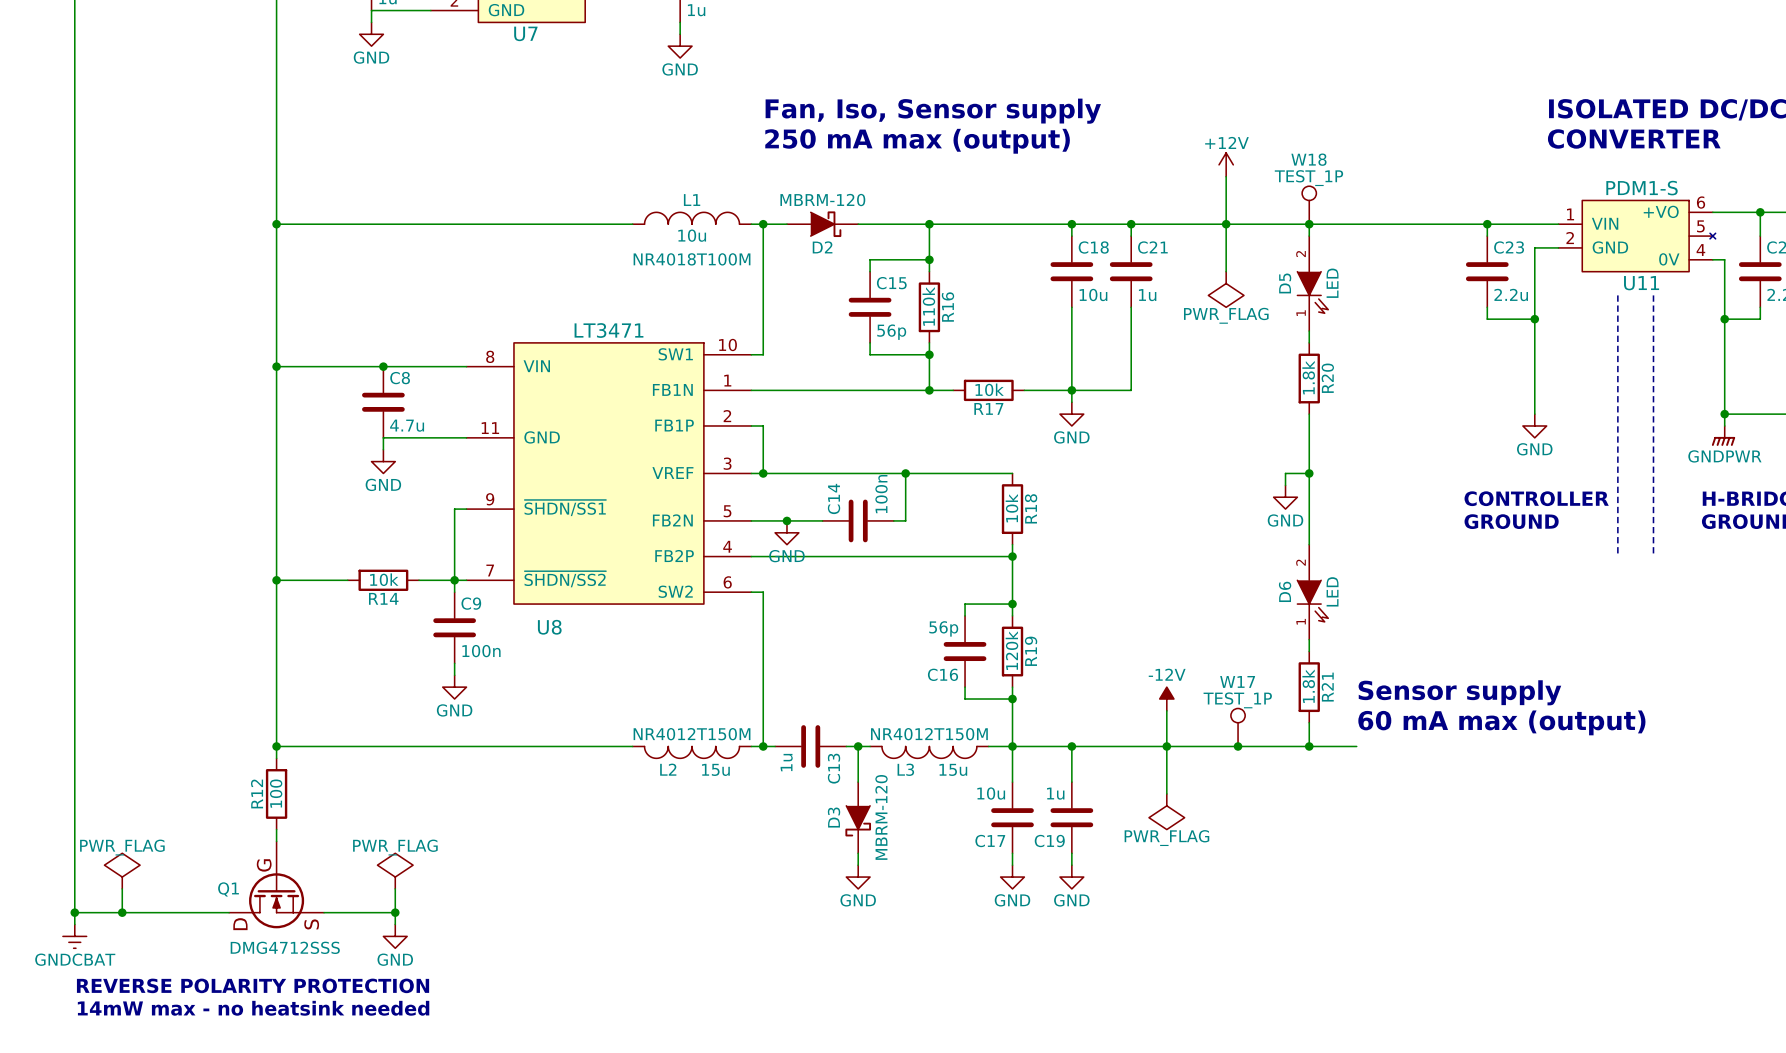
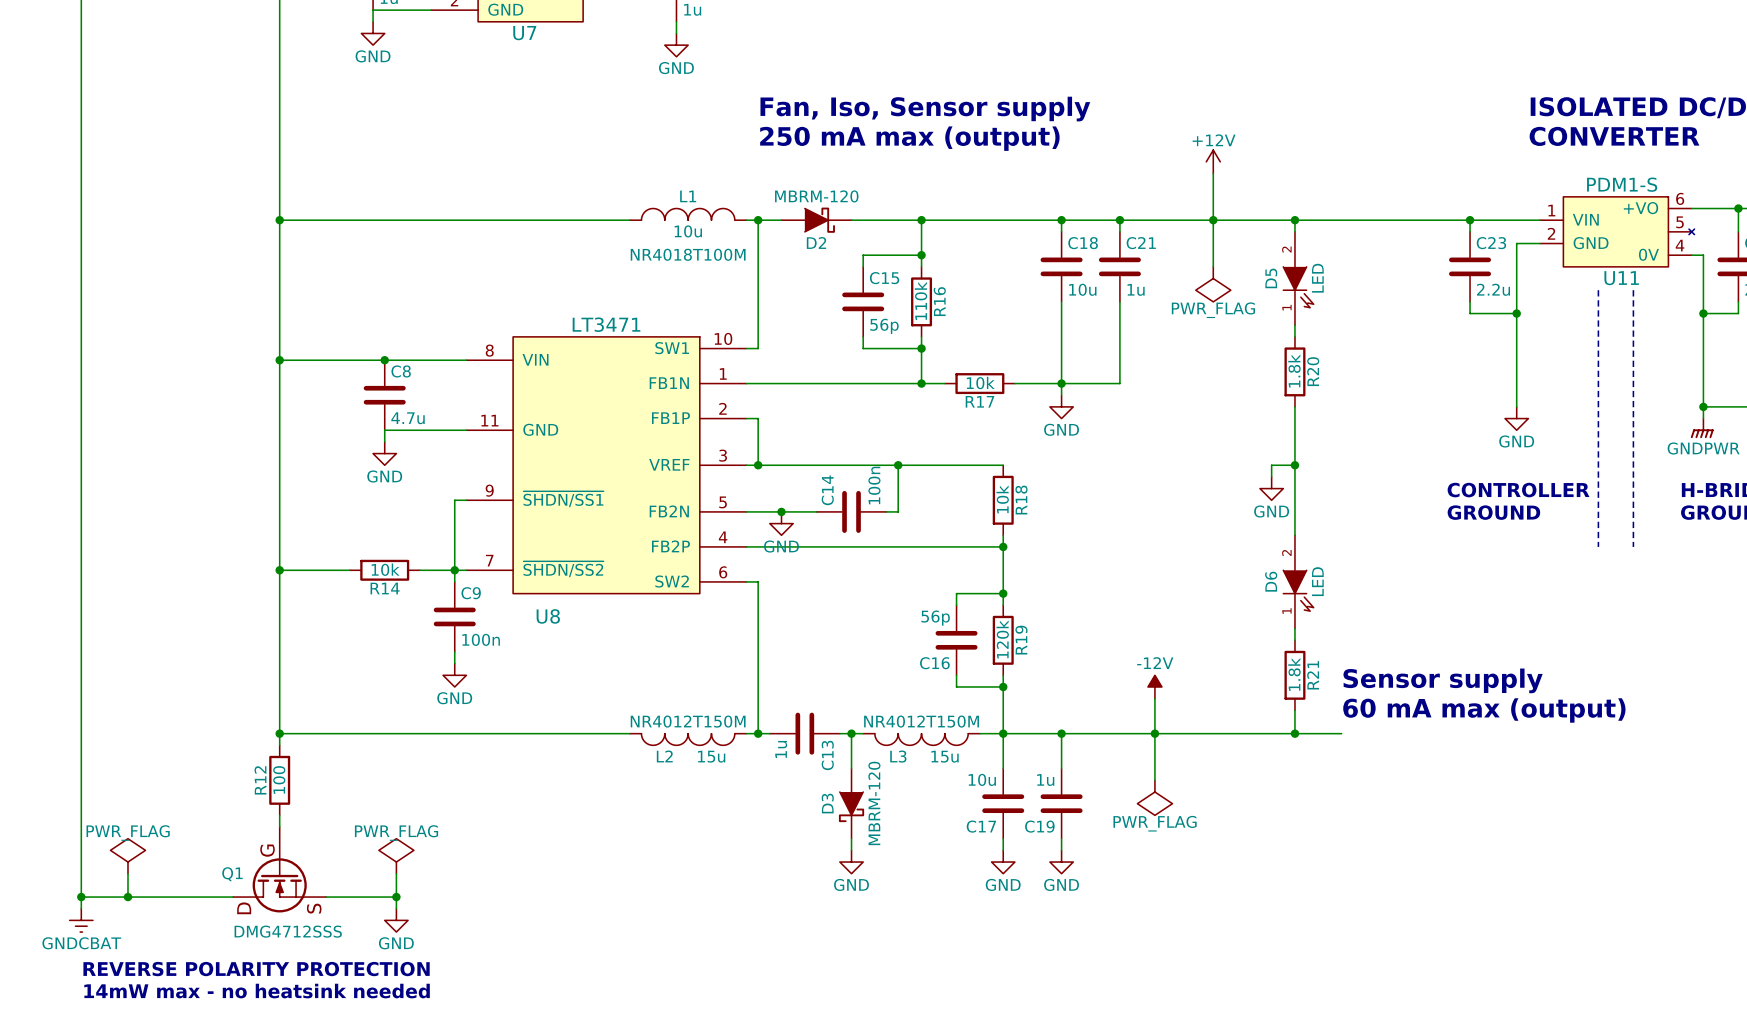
W18: TEST_1P (1309, 205) -> none
W17: TEST_1P (1238, 727) -> none
junction: (1238, 746) -> none

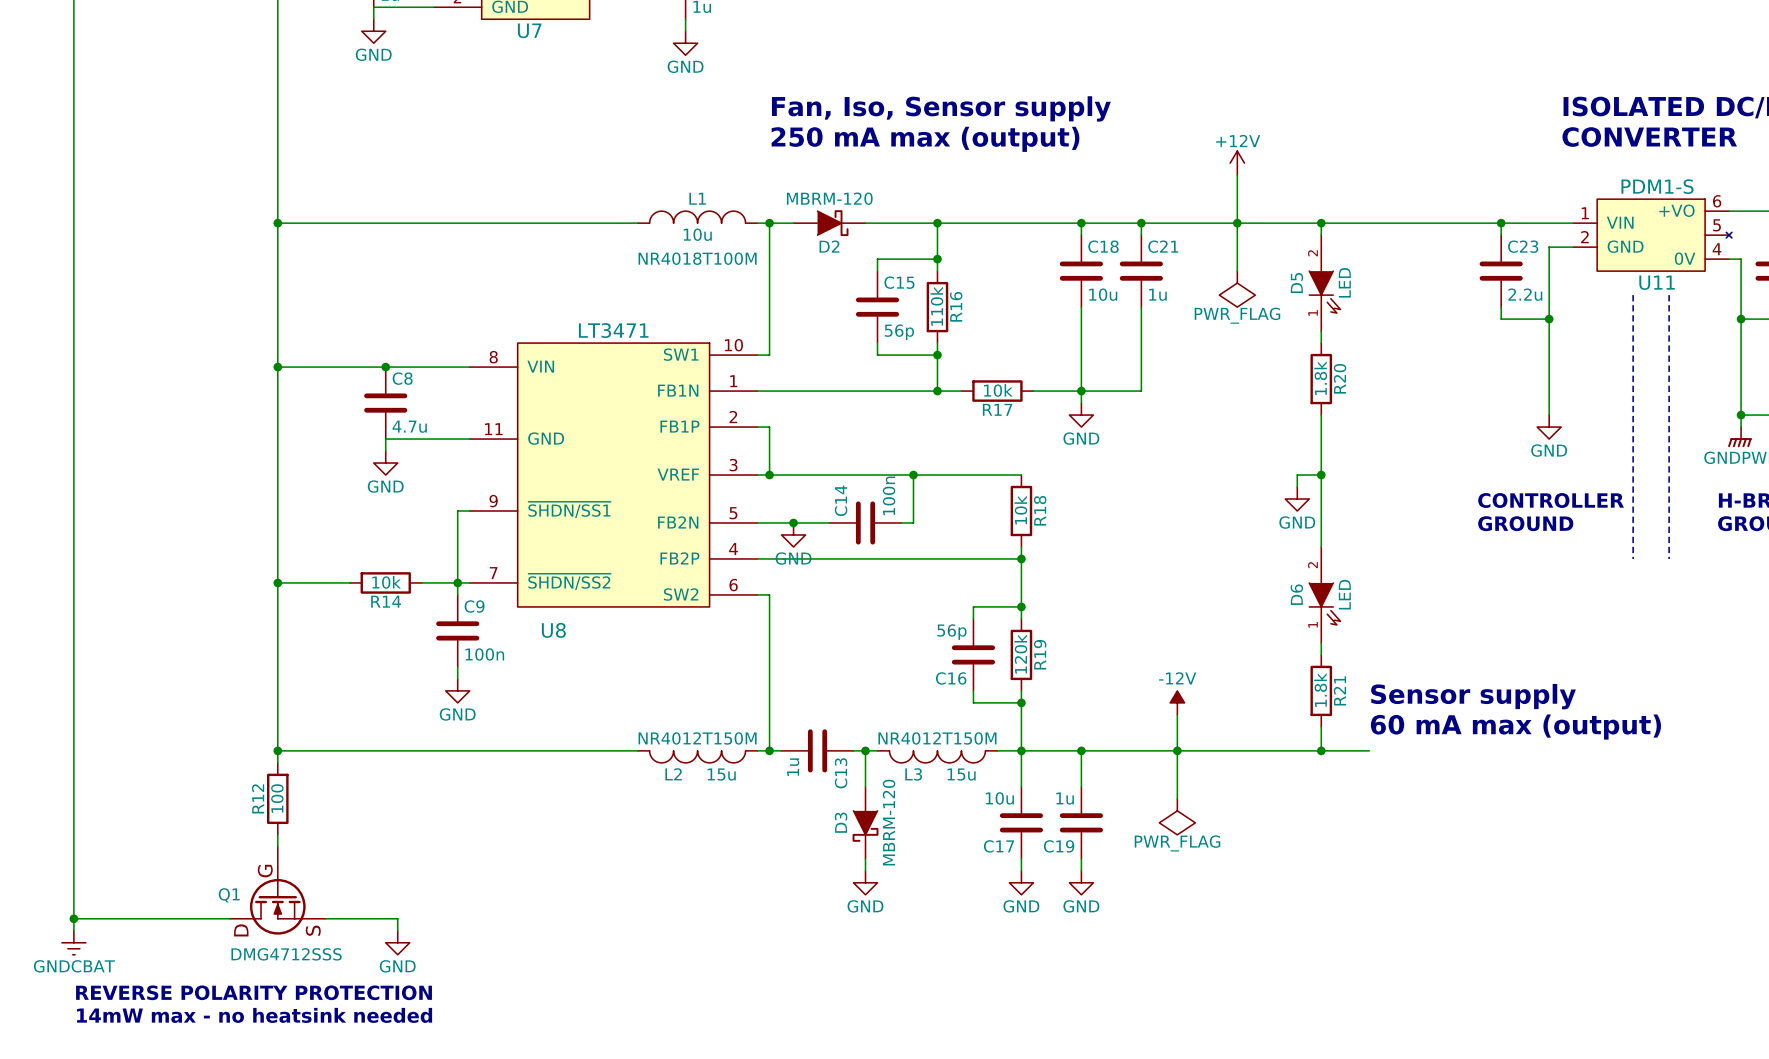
power symbol: PWR_FLAG (127, 856) -> none
power symbol: PWR_FLAG (396, 856) -> none
wire: (127, 873) (127, 897) -> none
wire: (396, 873) (396, 897) -> none
junction: (127, 897) -> none
junction: (396, 897) -> none

